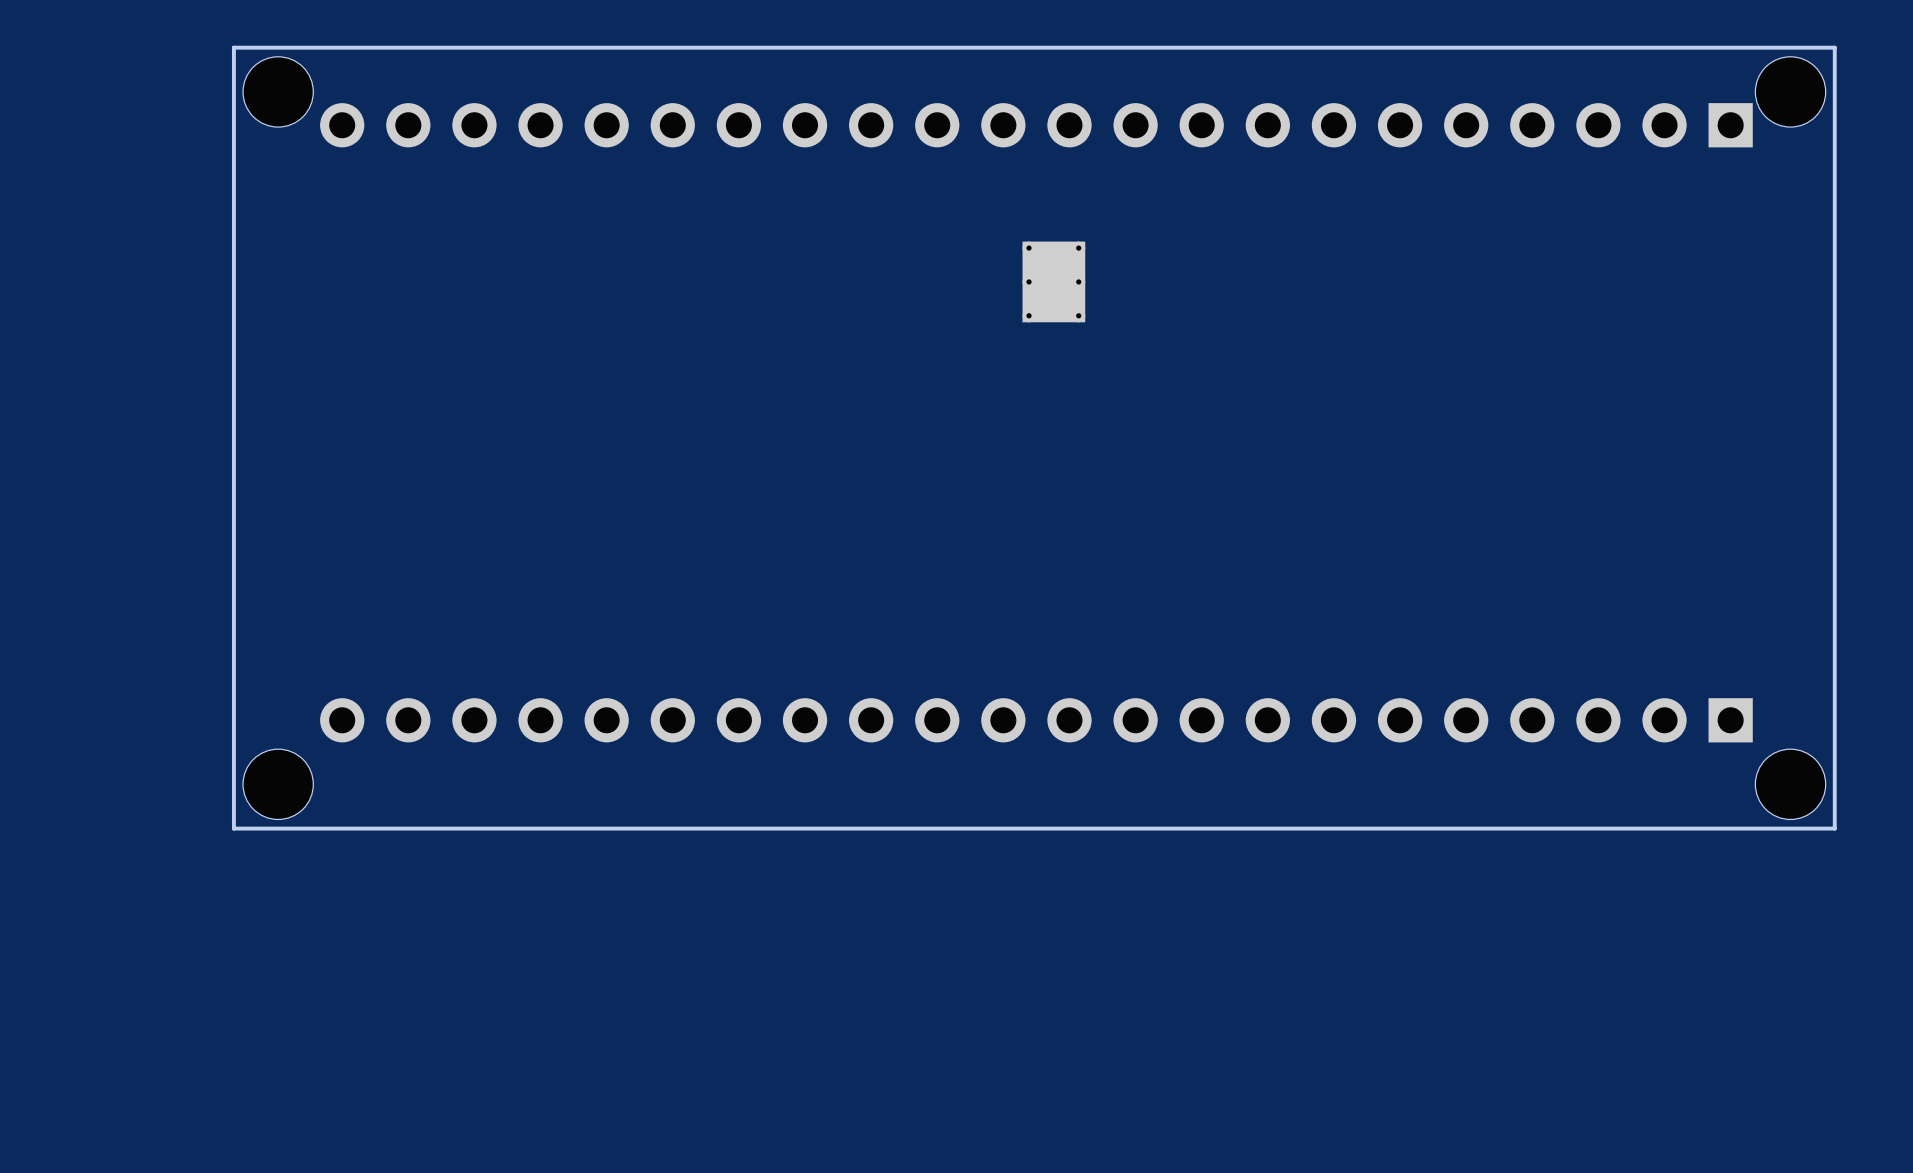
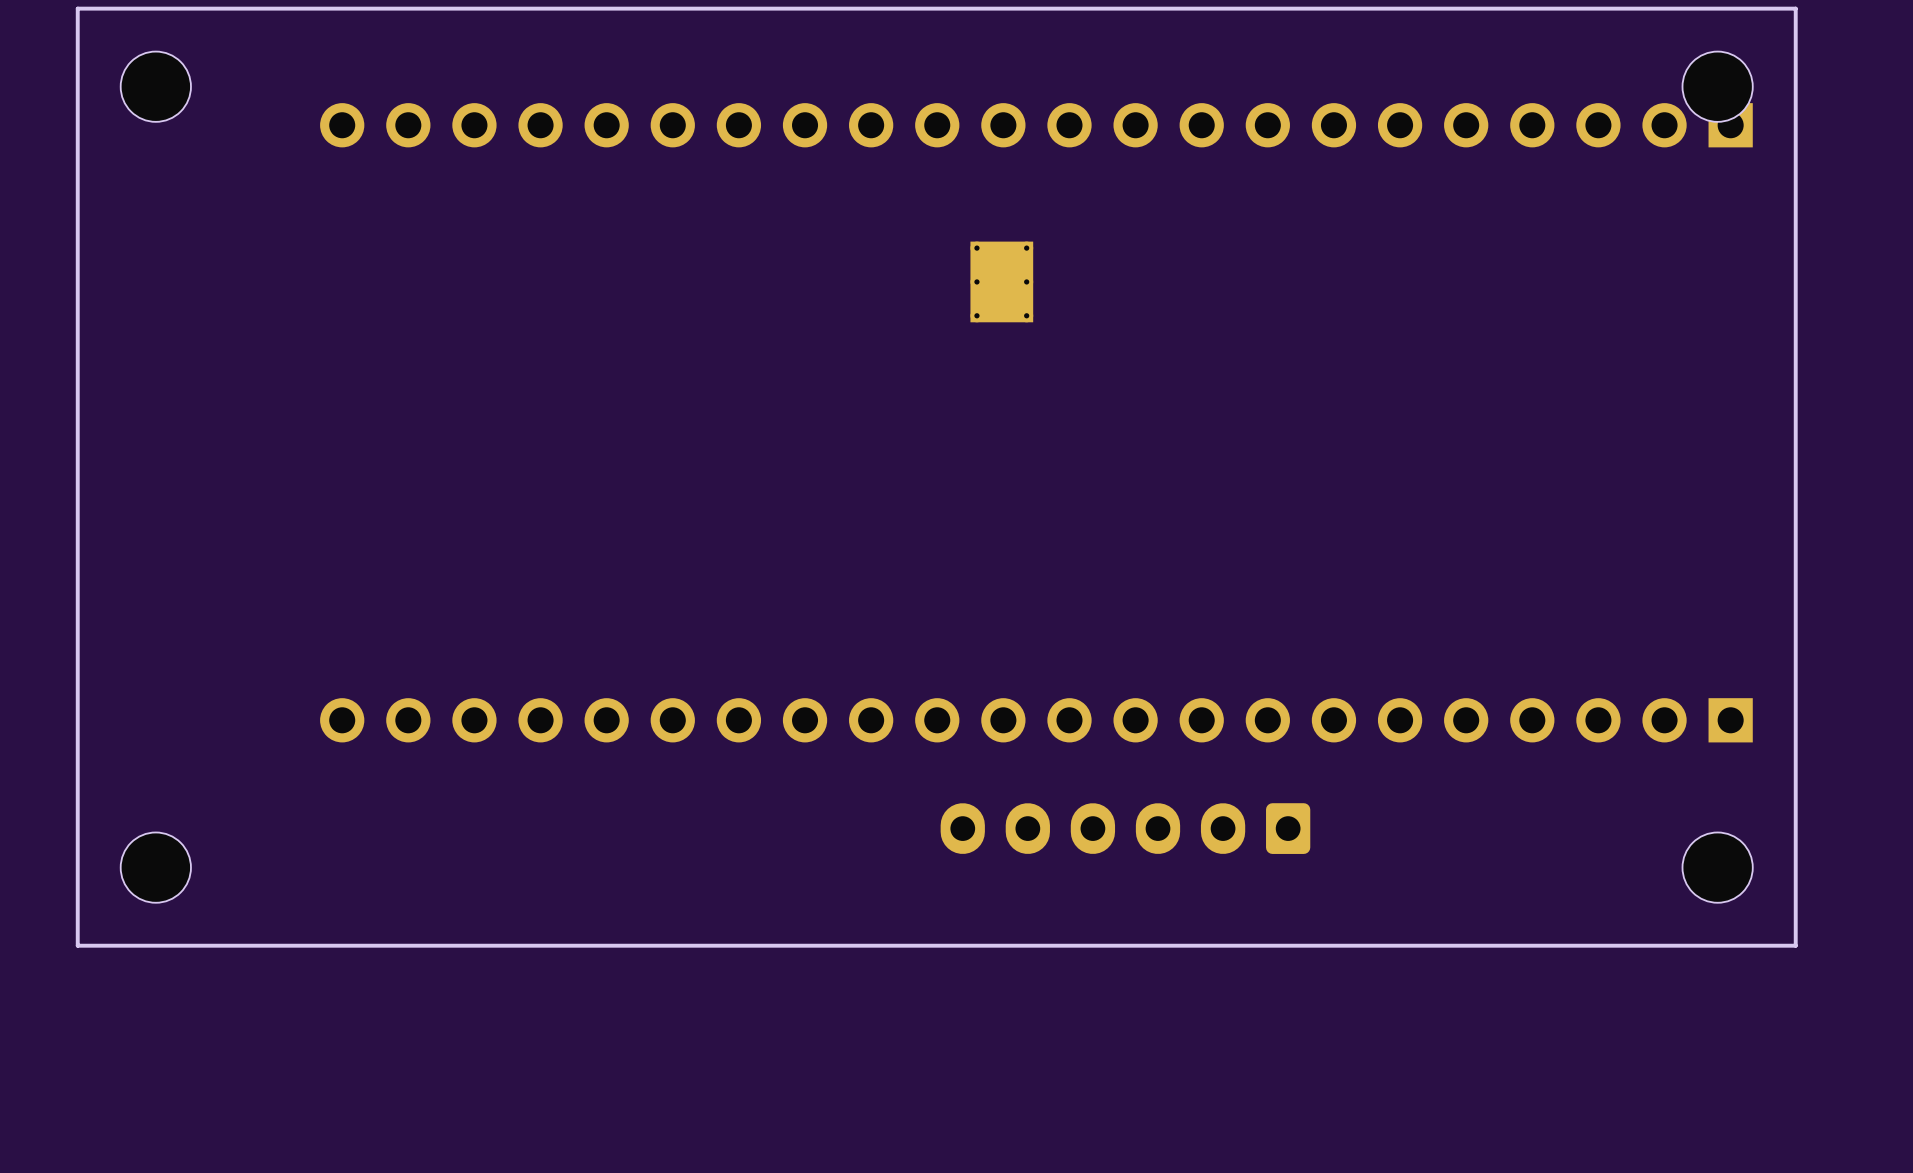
board edge: (1834, 47) (233, 47) (233, 828) (1834, 828) (1834, 47) -> (1795, 8) (1795, 945) (77, 945) (77, 8) (1795, 8)
part position: (278, 91) -> (155, 86)
part position: (1790, 91) -> (1717, 86)
part position: (1053, 281) -> (1001, 281)
part position: (278, 784) -> (155, 867)
part position: (1790, 784) -> (1717, 867)
part: none -> (1125, 828)

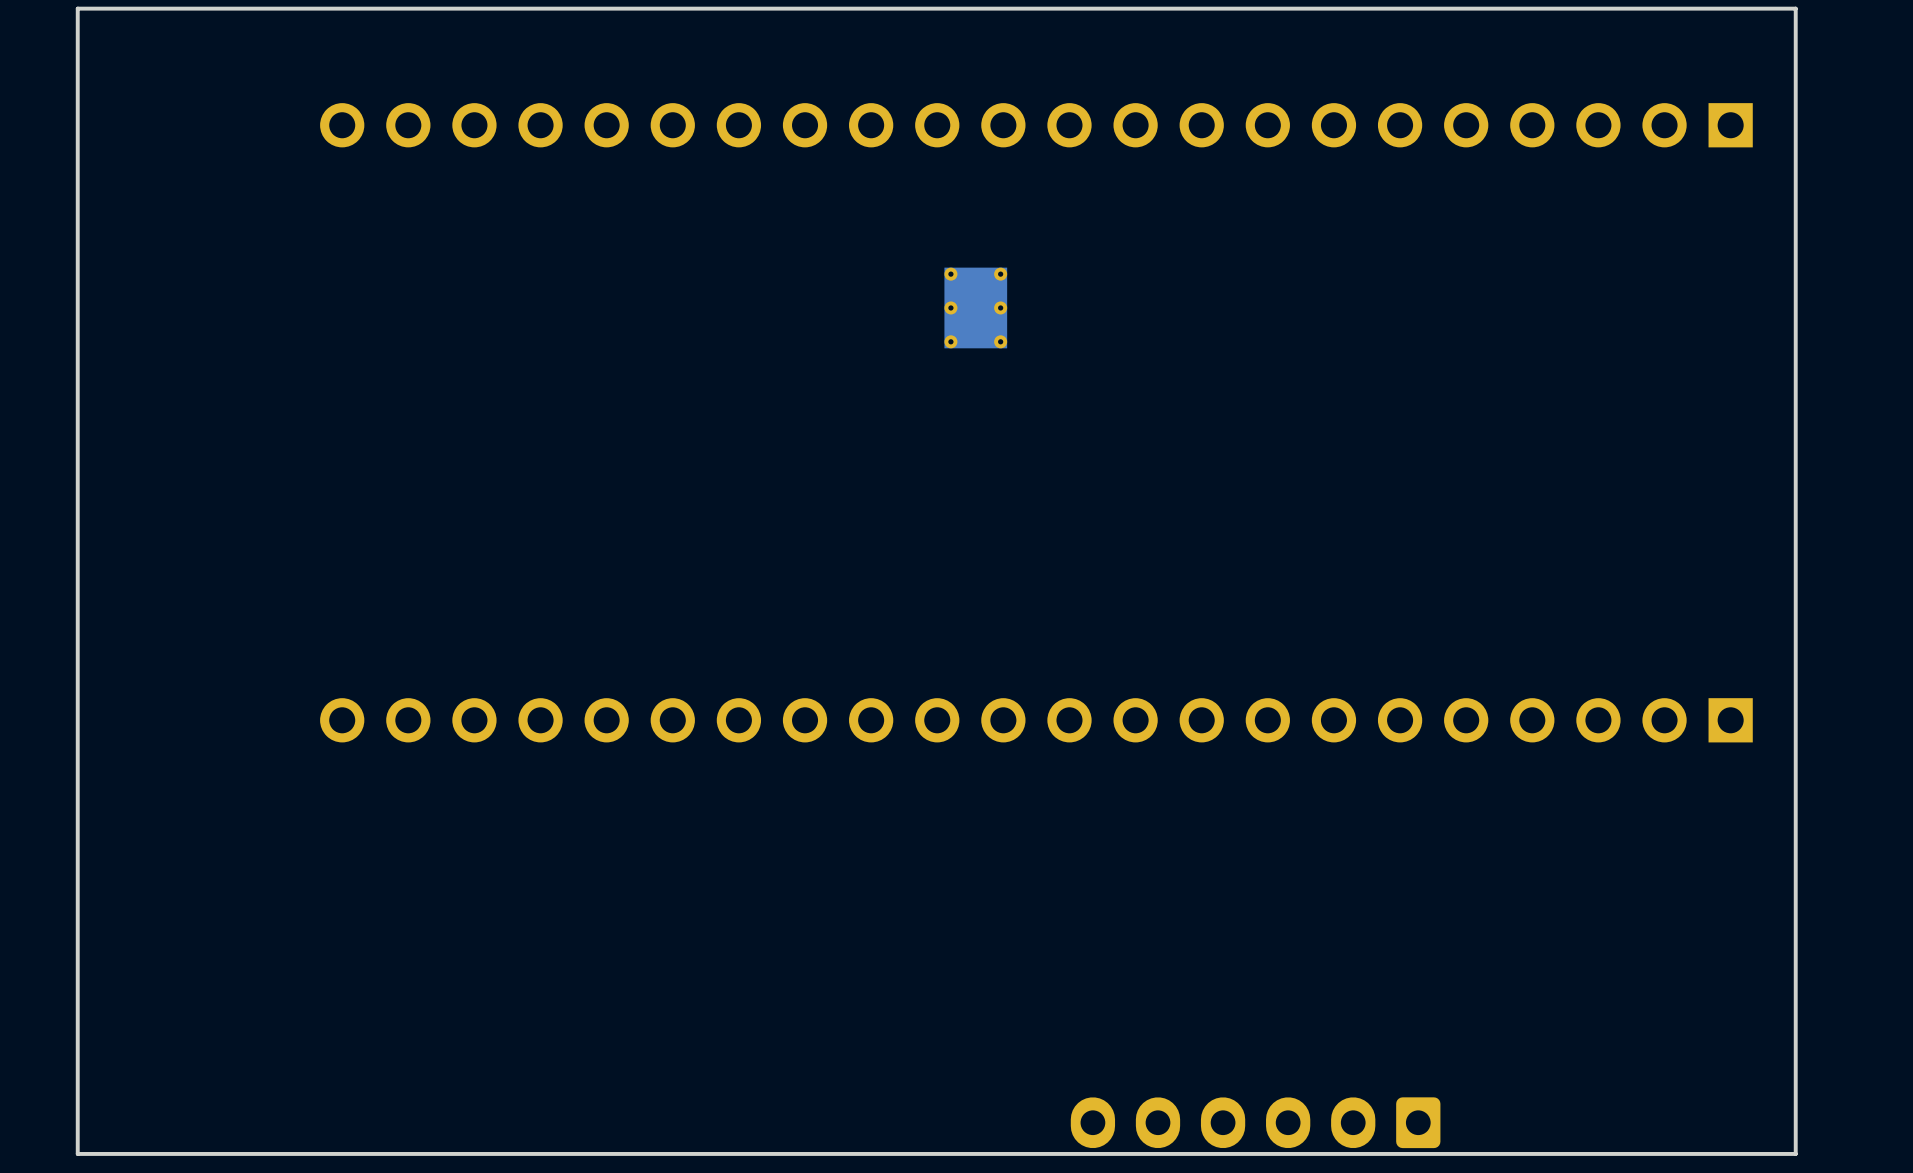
part: (155, 86) -> none
part: (1717, 86) -> none
part position: (1001, 281) -> (975, 307)
part position: (1125, 828) -> (1255, 1122)
part: (155, 867) -> none
part: (1717, 867) -> none
board edge: (1795, 945) (77, 945) -> (1795, 945) (1795, 1153) (77, 1153) (77, 945)

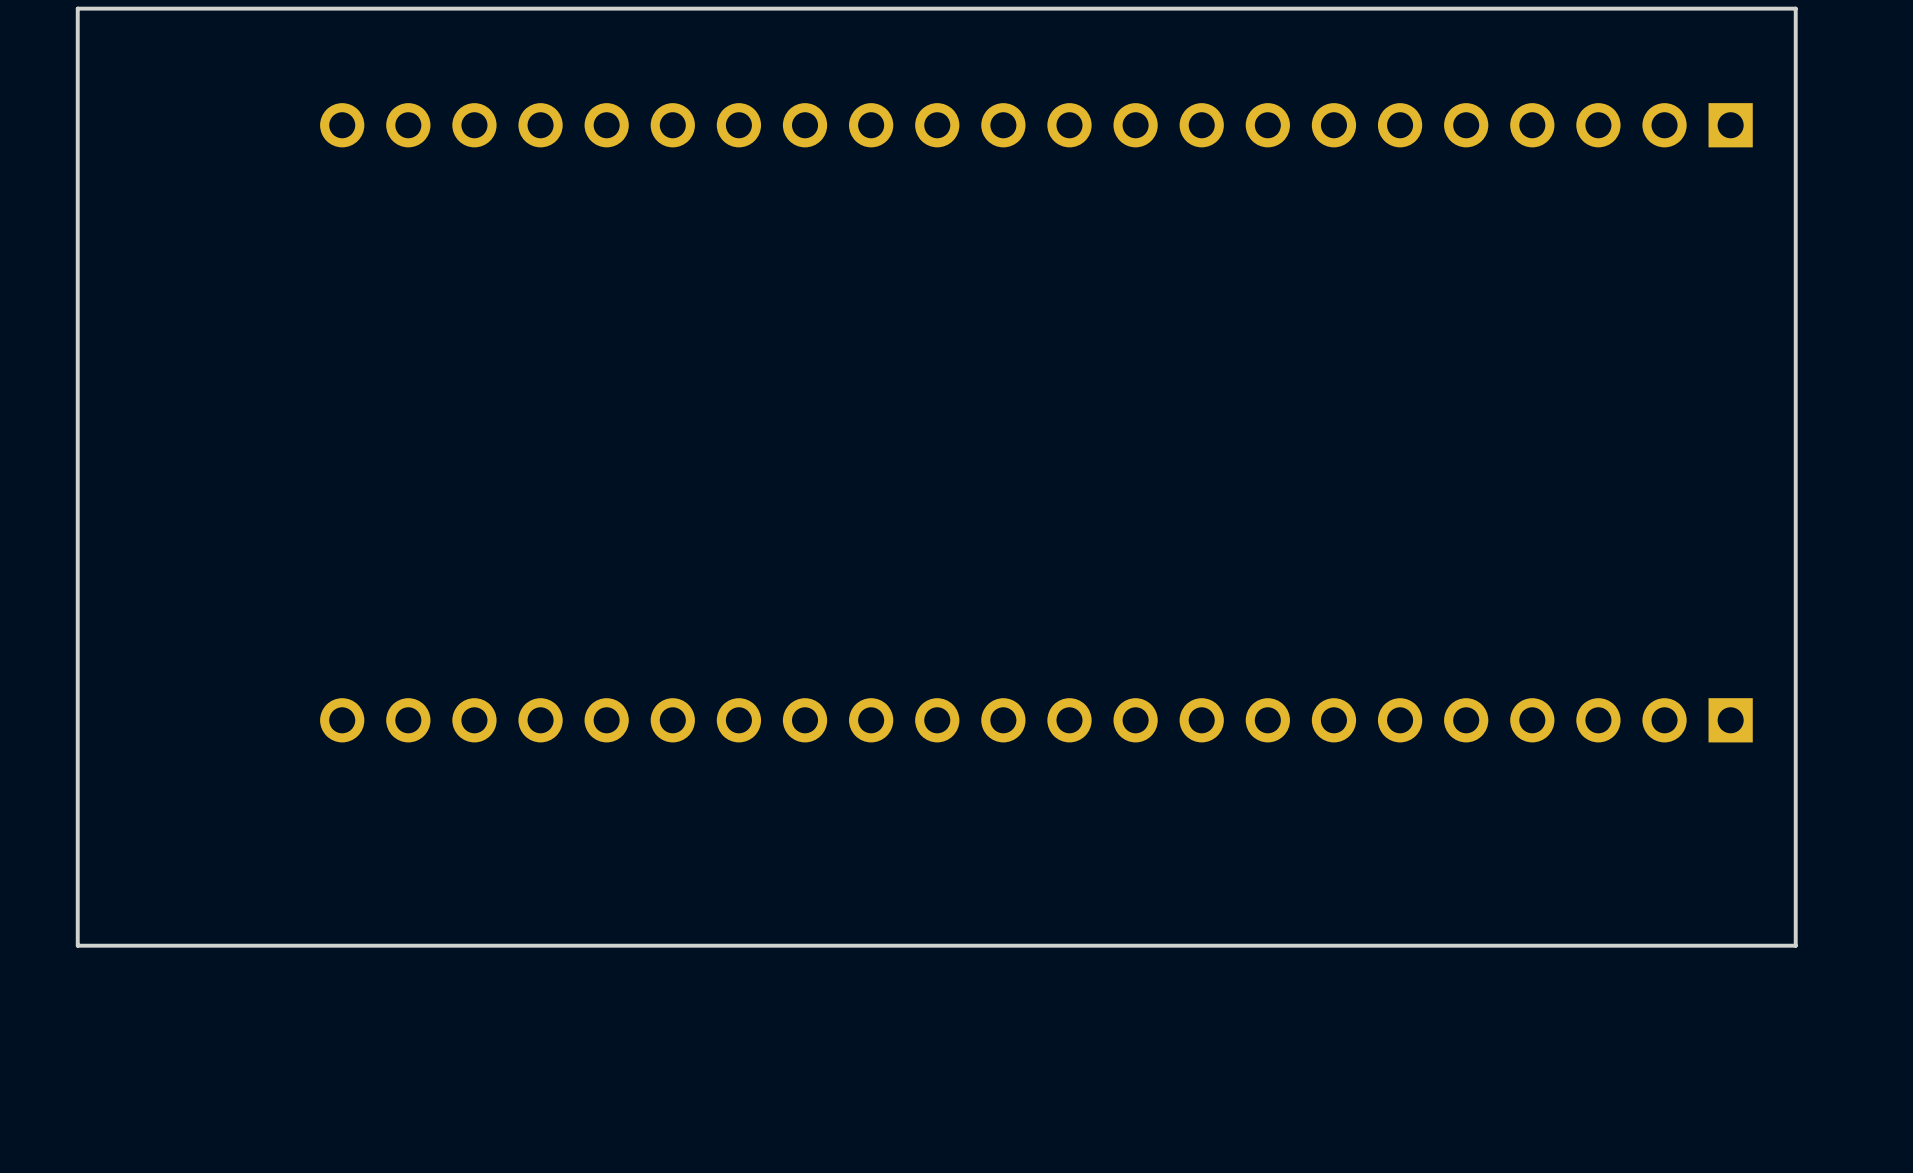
part: (975, 307) -> none
board edge: (1795, 945) (1795, 1153) (77, 1153) (77, 945) -> (1795, 945) (77, 945)
part: (1255, 1122) -> none

